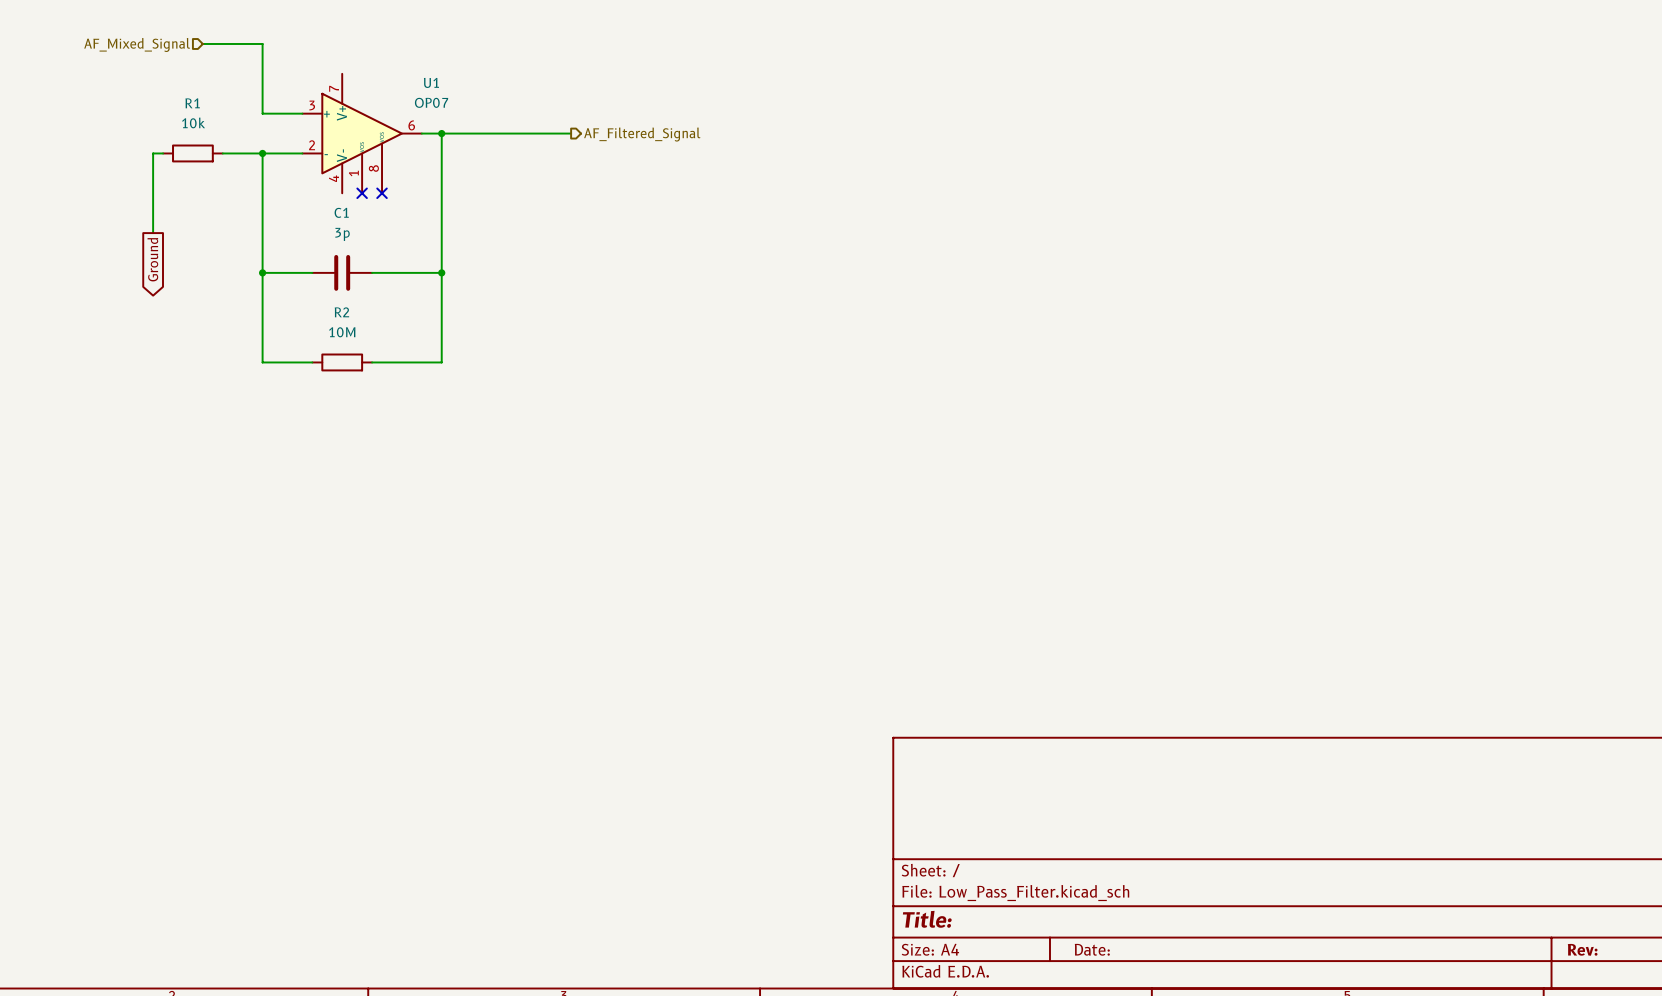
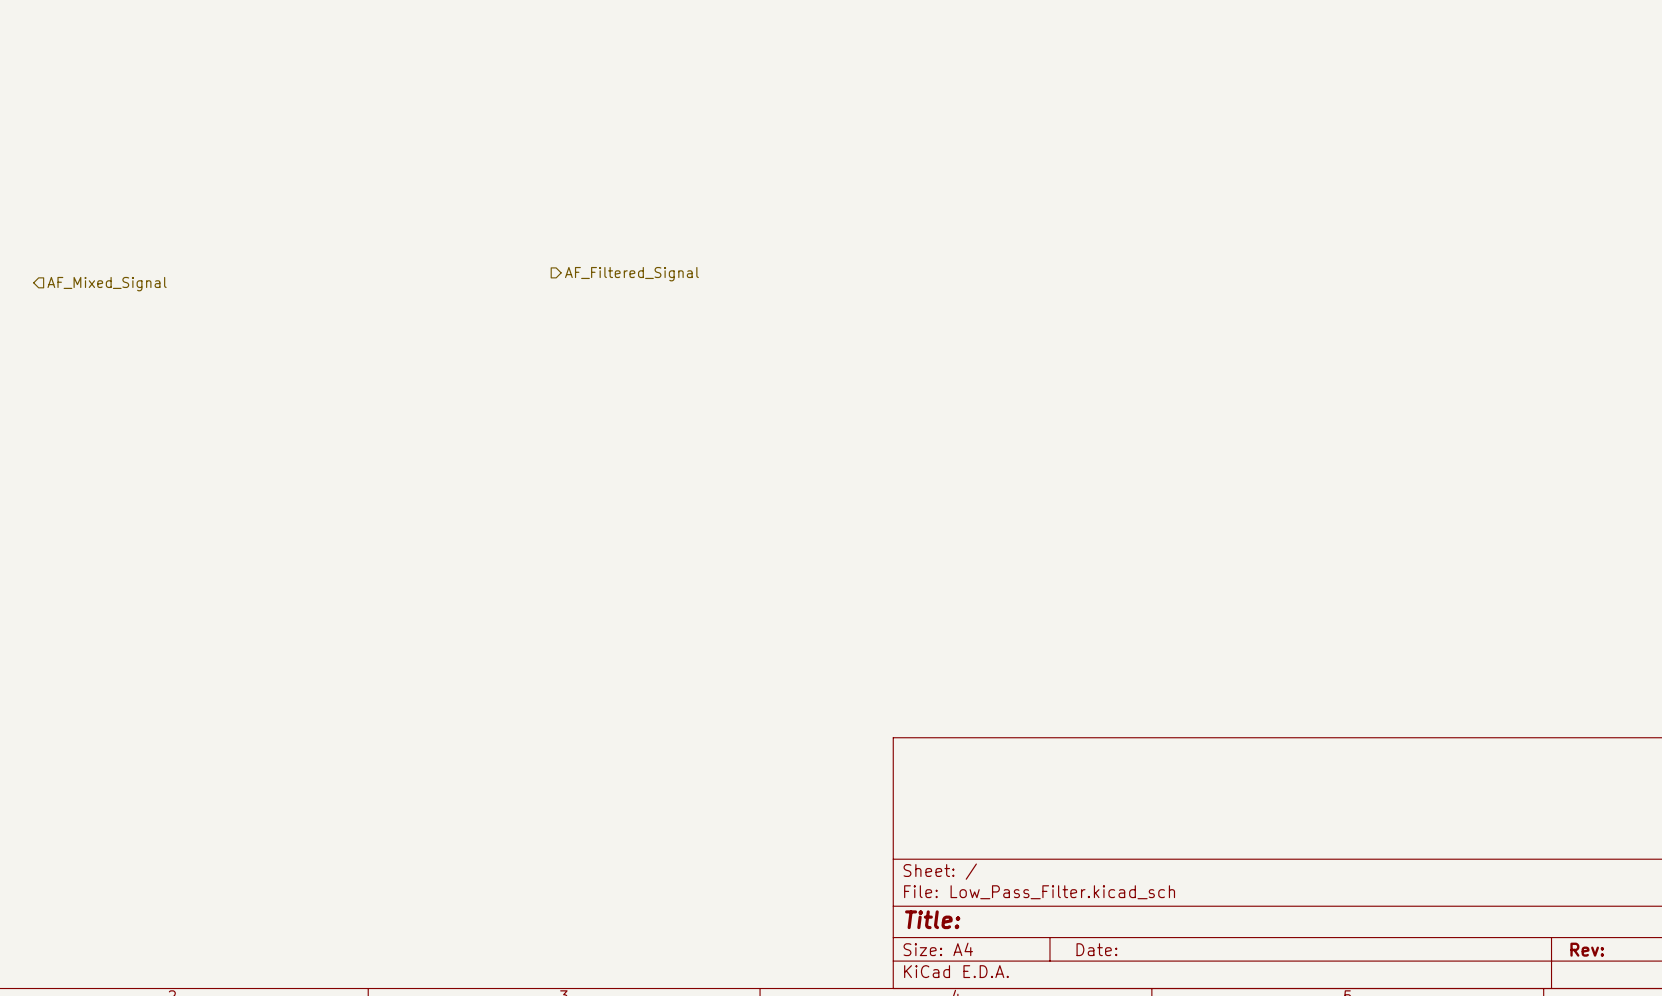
wire: (202, 43) (262, 43) (262, 113) (302, 113) -> none
hierarchical label: AF_Mixed_Signal (137, 44) -> none
U1: OP07 (362, 133) -> none
wire: (421, 133) (571, 133) -> none
wire: (441, 133) (441, 362) (372, 362) -> none
junction: (441, 133) -> none
hierarchical label position: AF_Filtered_Signal (642, 134) -> AF_Filtered_Signal (631, 274)
wire: (163, 153) (153, 153) (153, 233) -> none
R1: 10k (192, 153) -> none
wire: (222, 153) (302, 153) -> none
wire: (262, 153) (262, 362) (312, 362) -> none
junction: (262, 153) -> none
no-connect mark: (362, 193) -> none
no-connect mark: (382, 193) -> none
global label: Ground (152, 259) -> none
wire: (262, 272) (312, 272) -> none
junction: (262, 272) -> none
C1: 3p (342, 272) -> none
wire: (372, 272) (441, 272) -> none
junction: (441, 272) -> none
hierarchical label: none -> AF_Mixed_Signal (107, 284)
R2: 10M (342, 362) -> none

